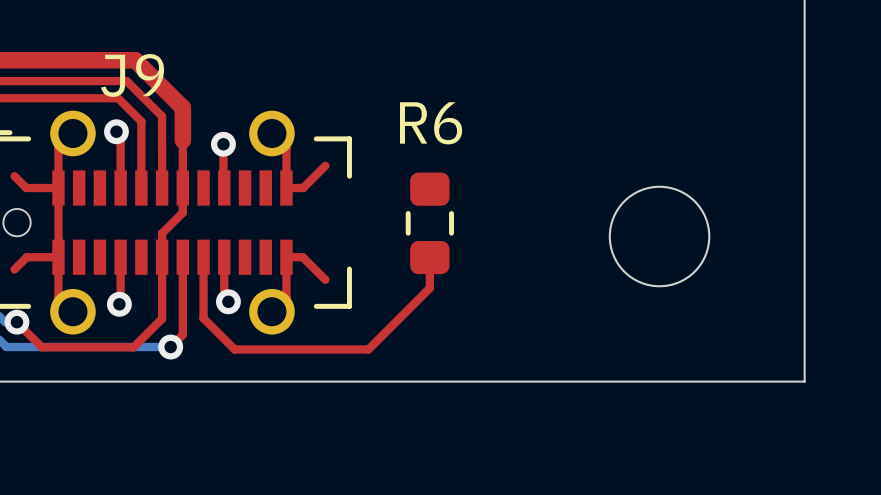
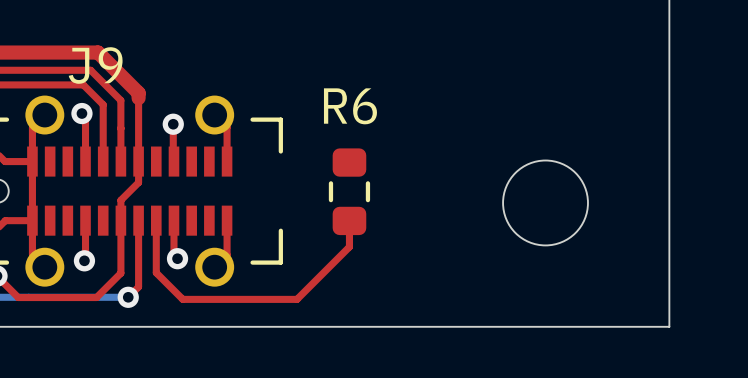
top track width: thick (182, 113) (182, 140) -> thin (138, 98) (138, 121)
top track: (325, 165) (303, 188) (286, 188) -> none
top track: (286, 257) (302, 257) (325, 279) -> none

